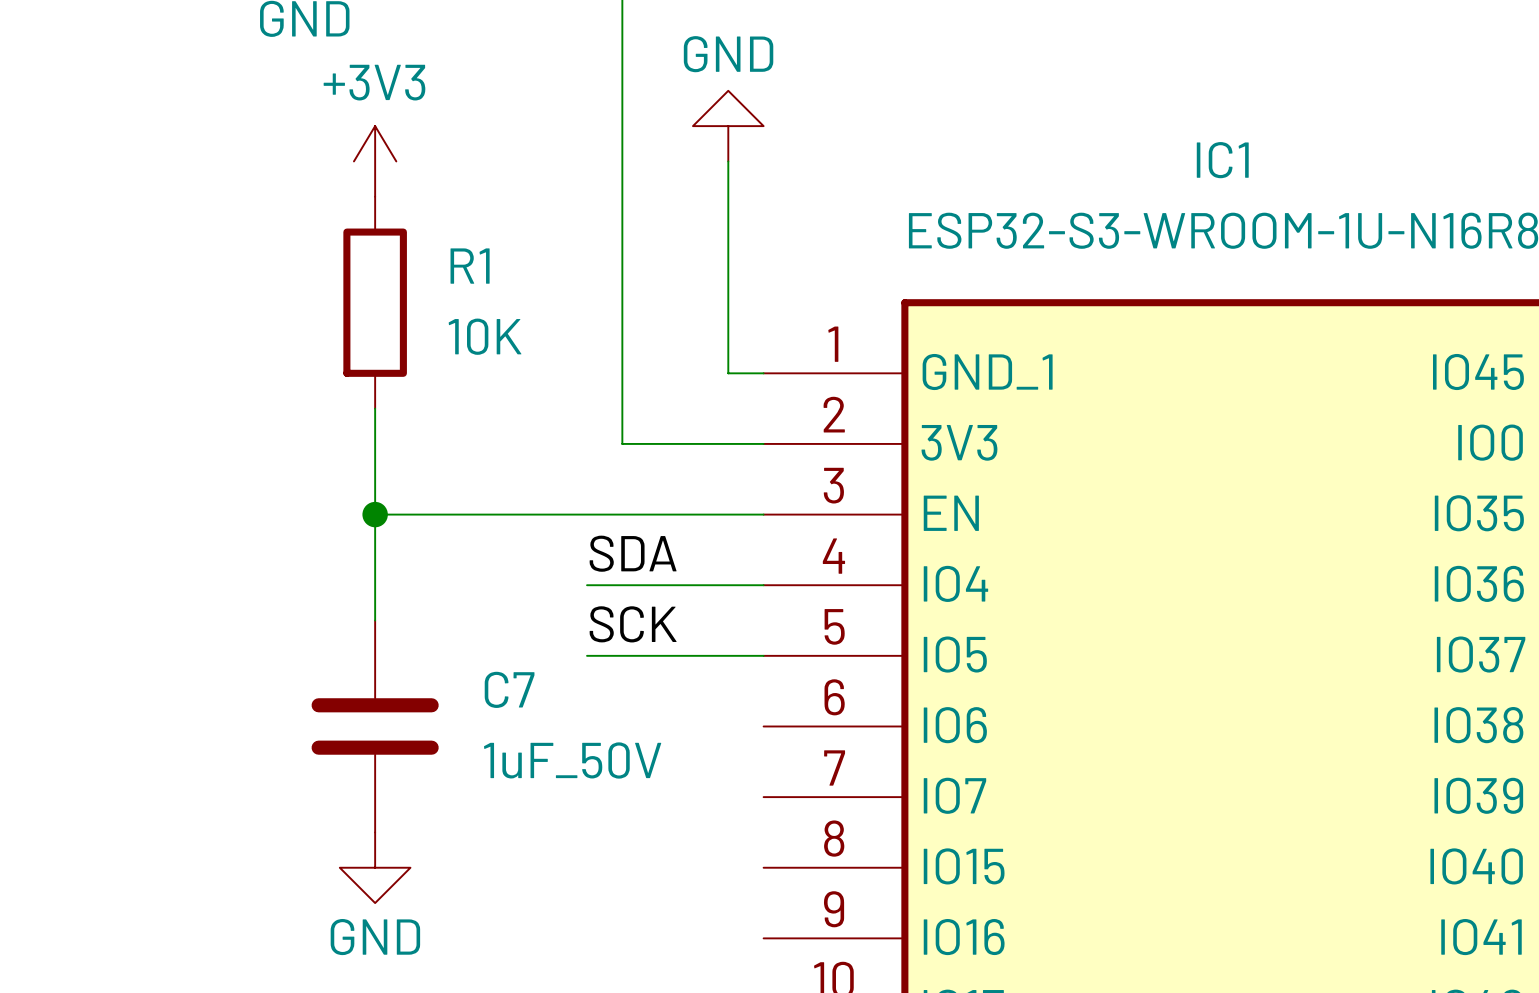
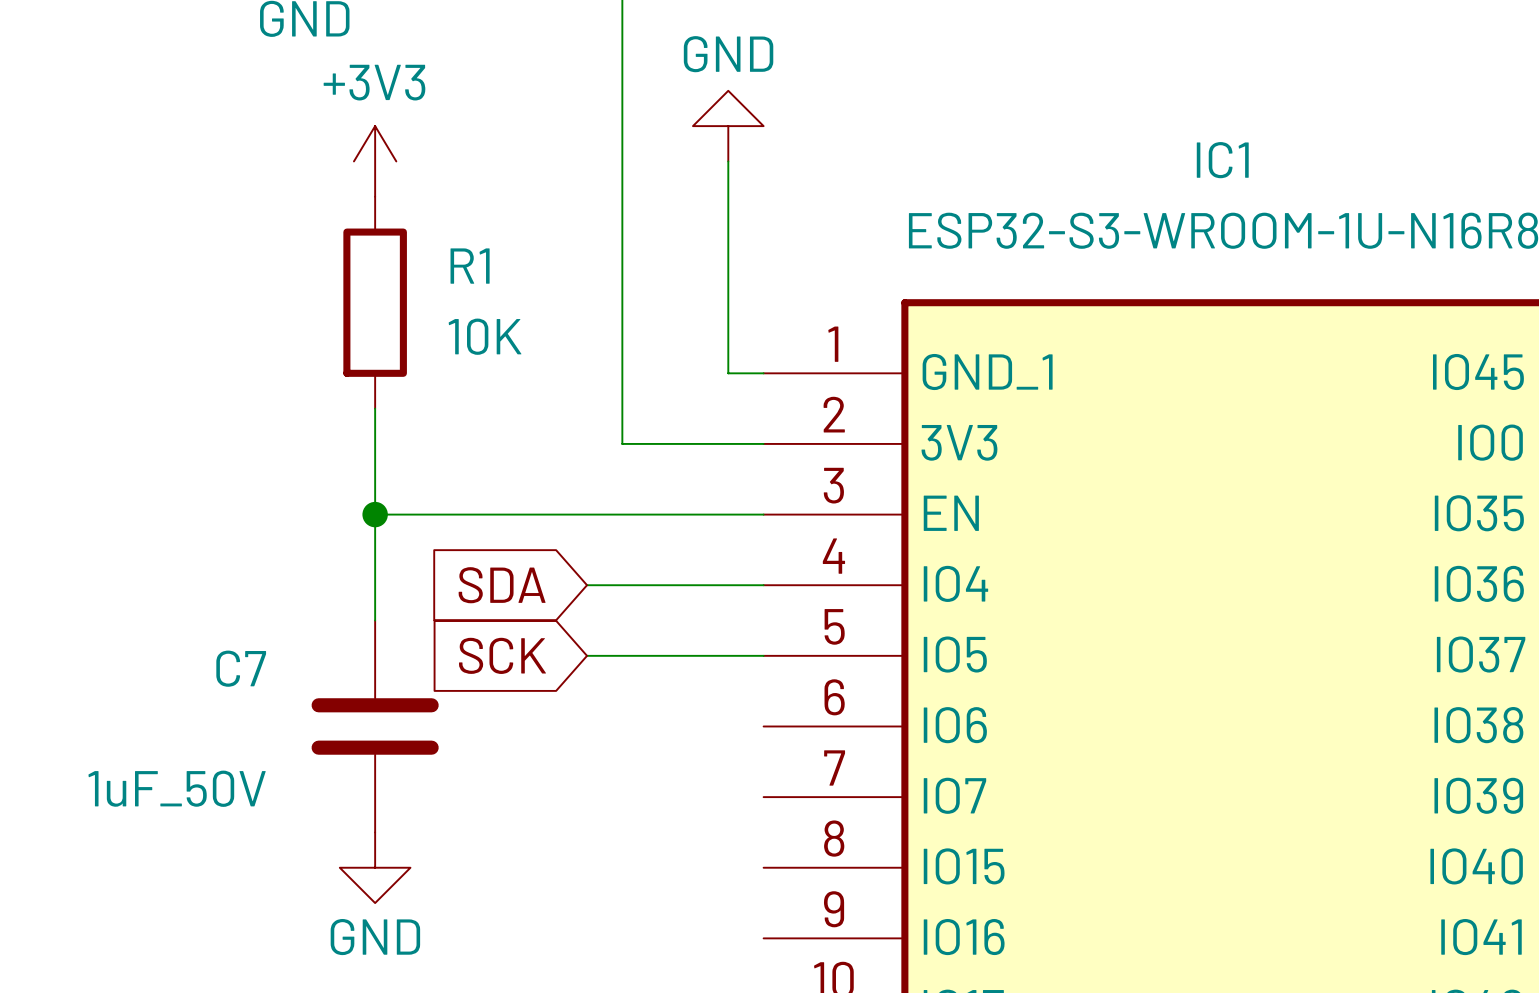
label: SDA (633, 553) -> none
global label: none -> SDA (502, 585)
label: SCK (633, 624) -> none
global label: none -> SCK (502, 655)
C7 name position: C7 (509, 689) -> C7 (241, 668)
C7 value position: 1uF_50V (572, 760) -> 1uF_50V (177, 788)

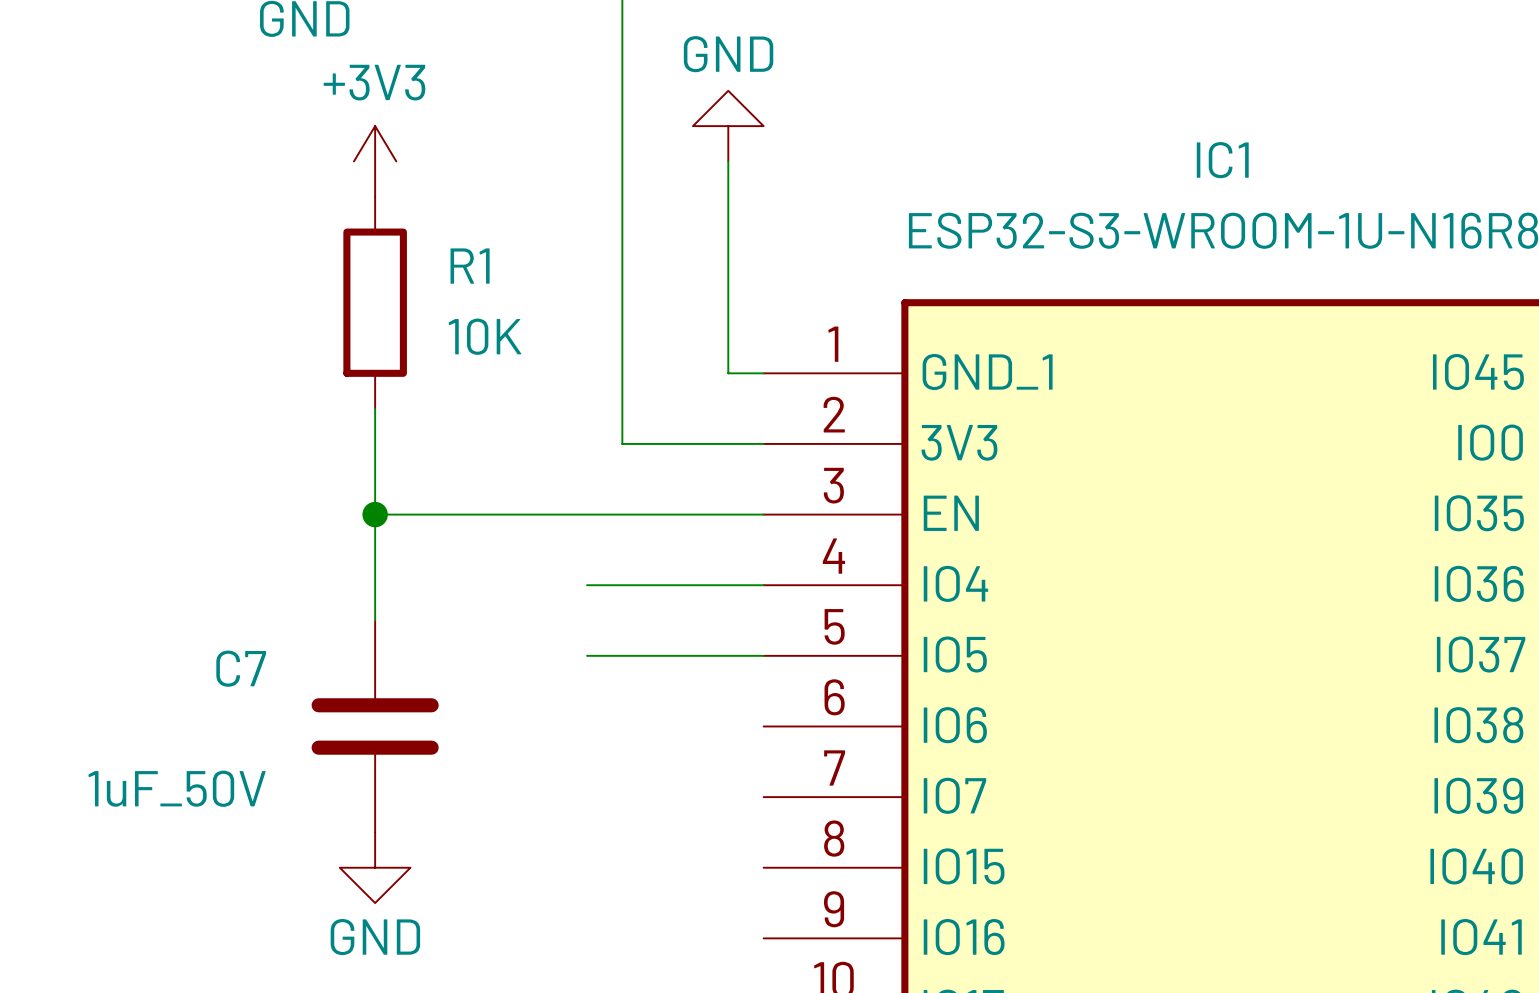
global label: SDA (502, 585) -> none
global label: SCK (502, 655) -> none

